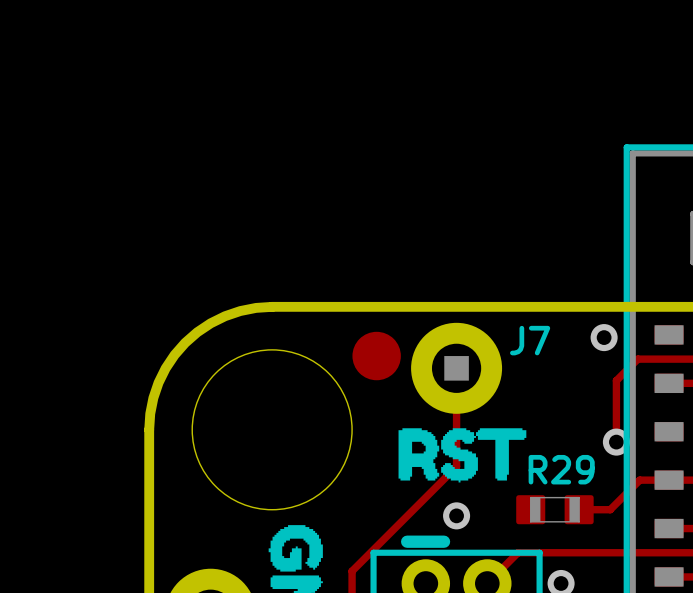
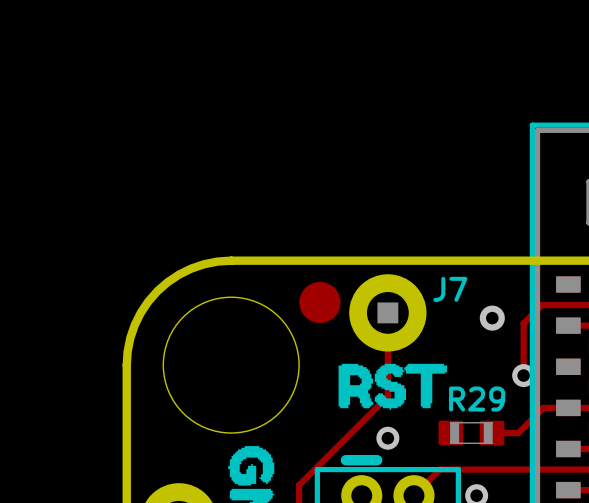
via: (604, 337) -> none
via: none -> (492, 318)

